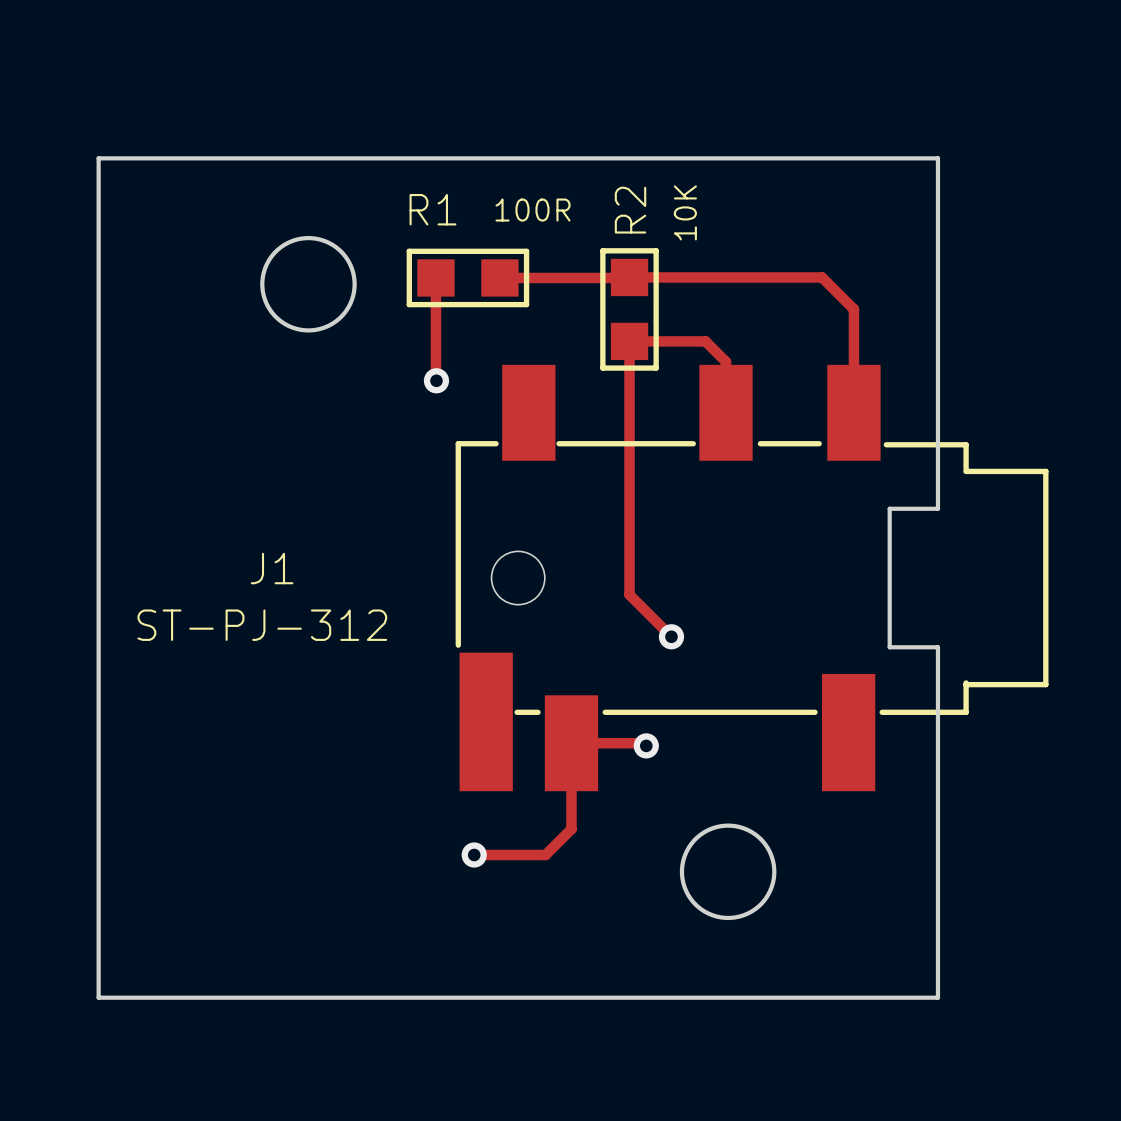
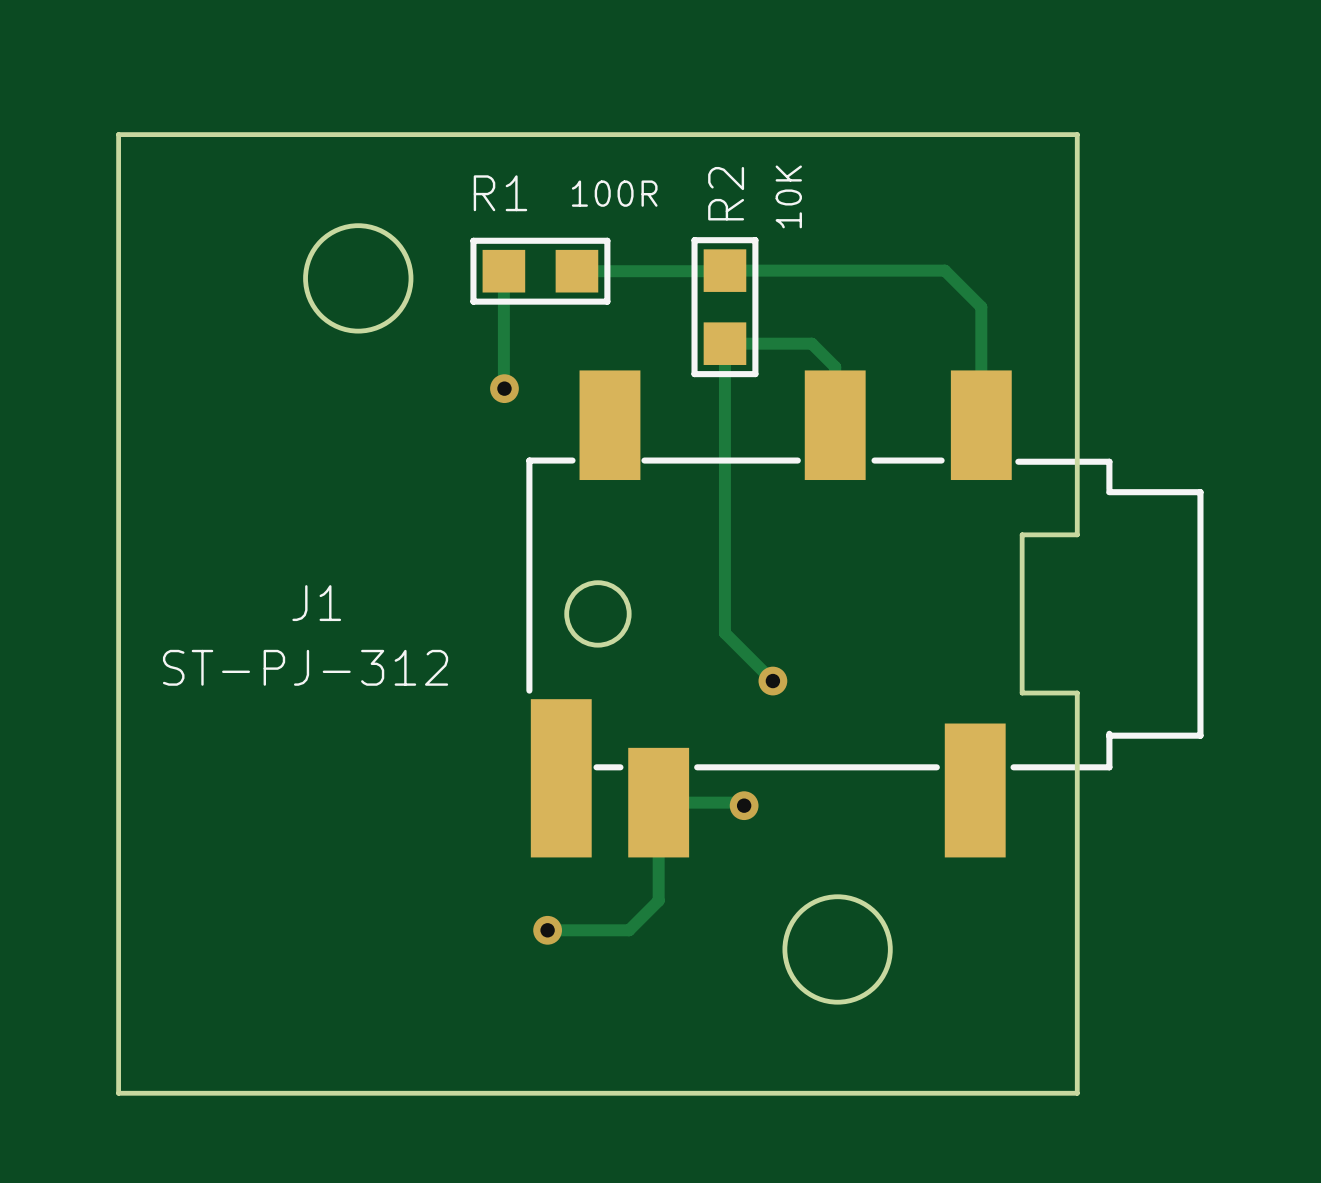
J1 footprint: [455, 364, 1049, 792] -> [526, 370, 1204, 858]
round board edge: none -> [564, 580, 632, 648]

